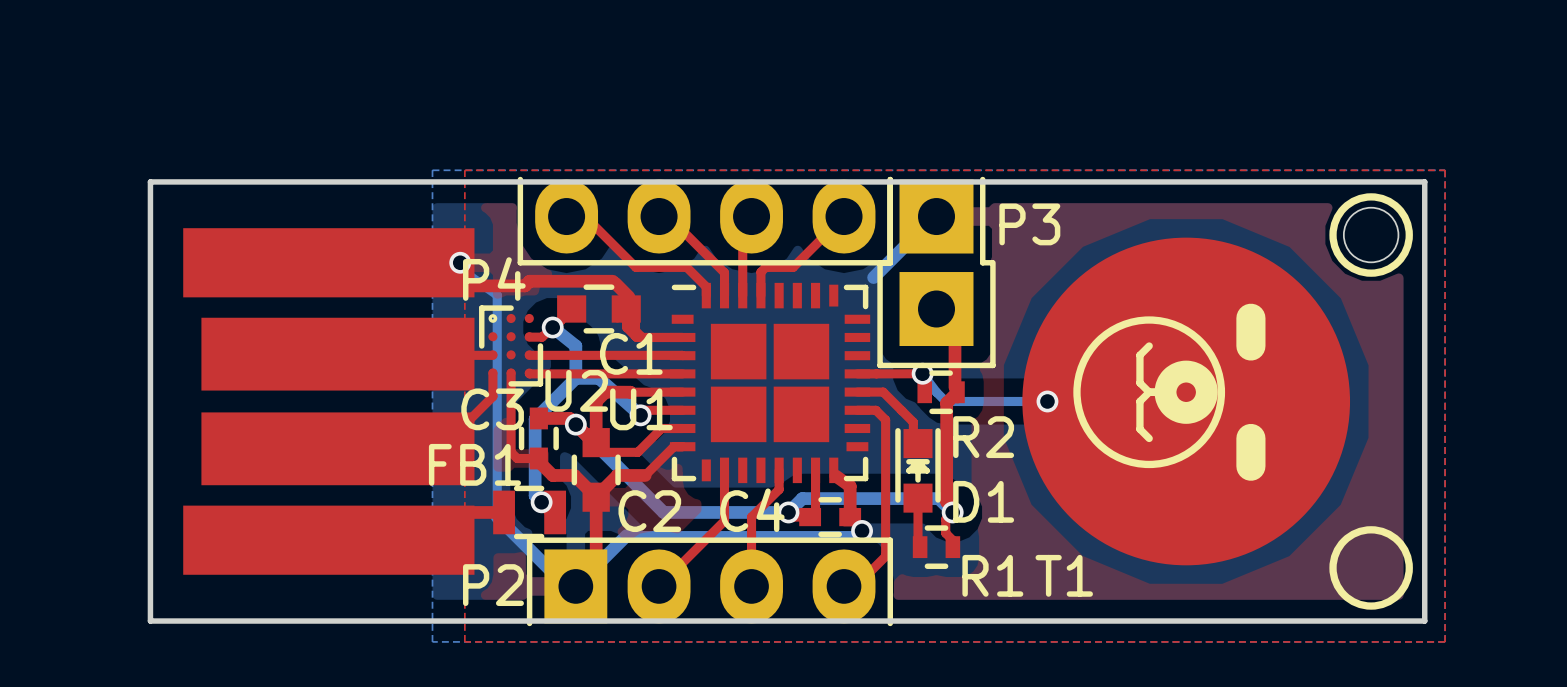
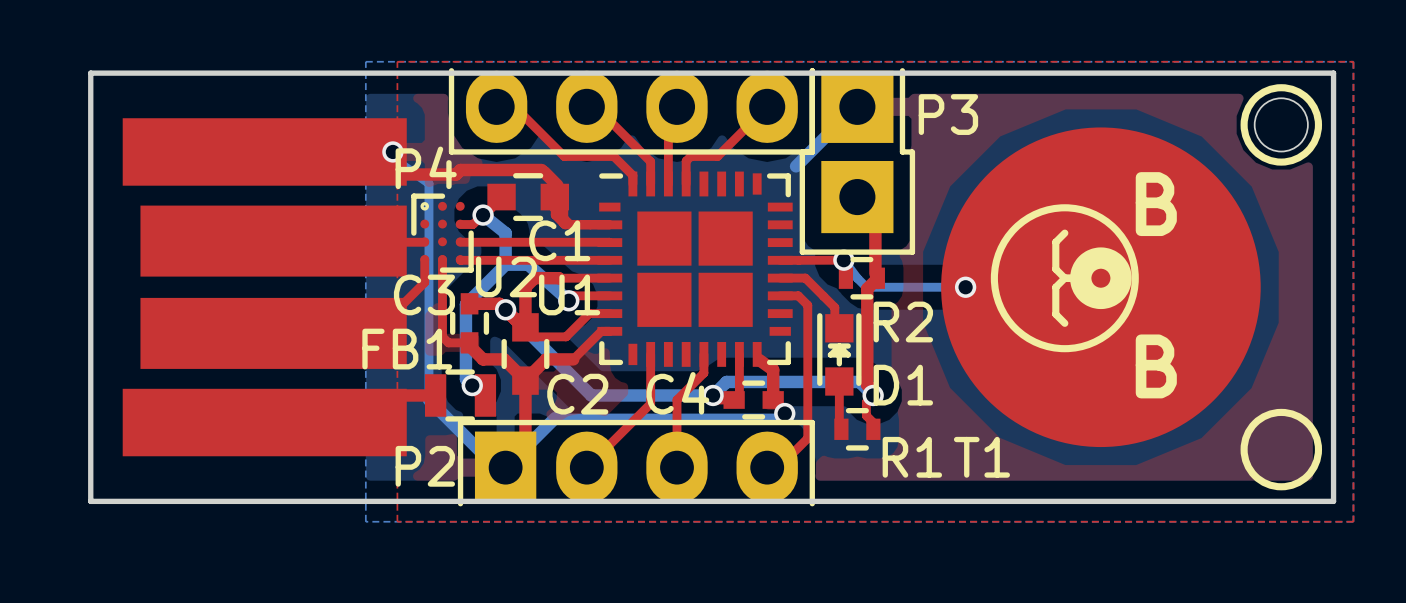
text: none -> B (1156, 204)
line: (1250, 318) (1250, 345) -> none
line: (1250, 438) (1250, 466) -> none
text: none -> B (1156, 366)

